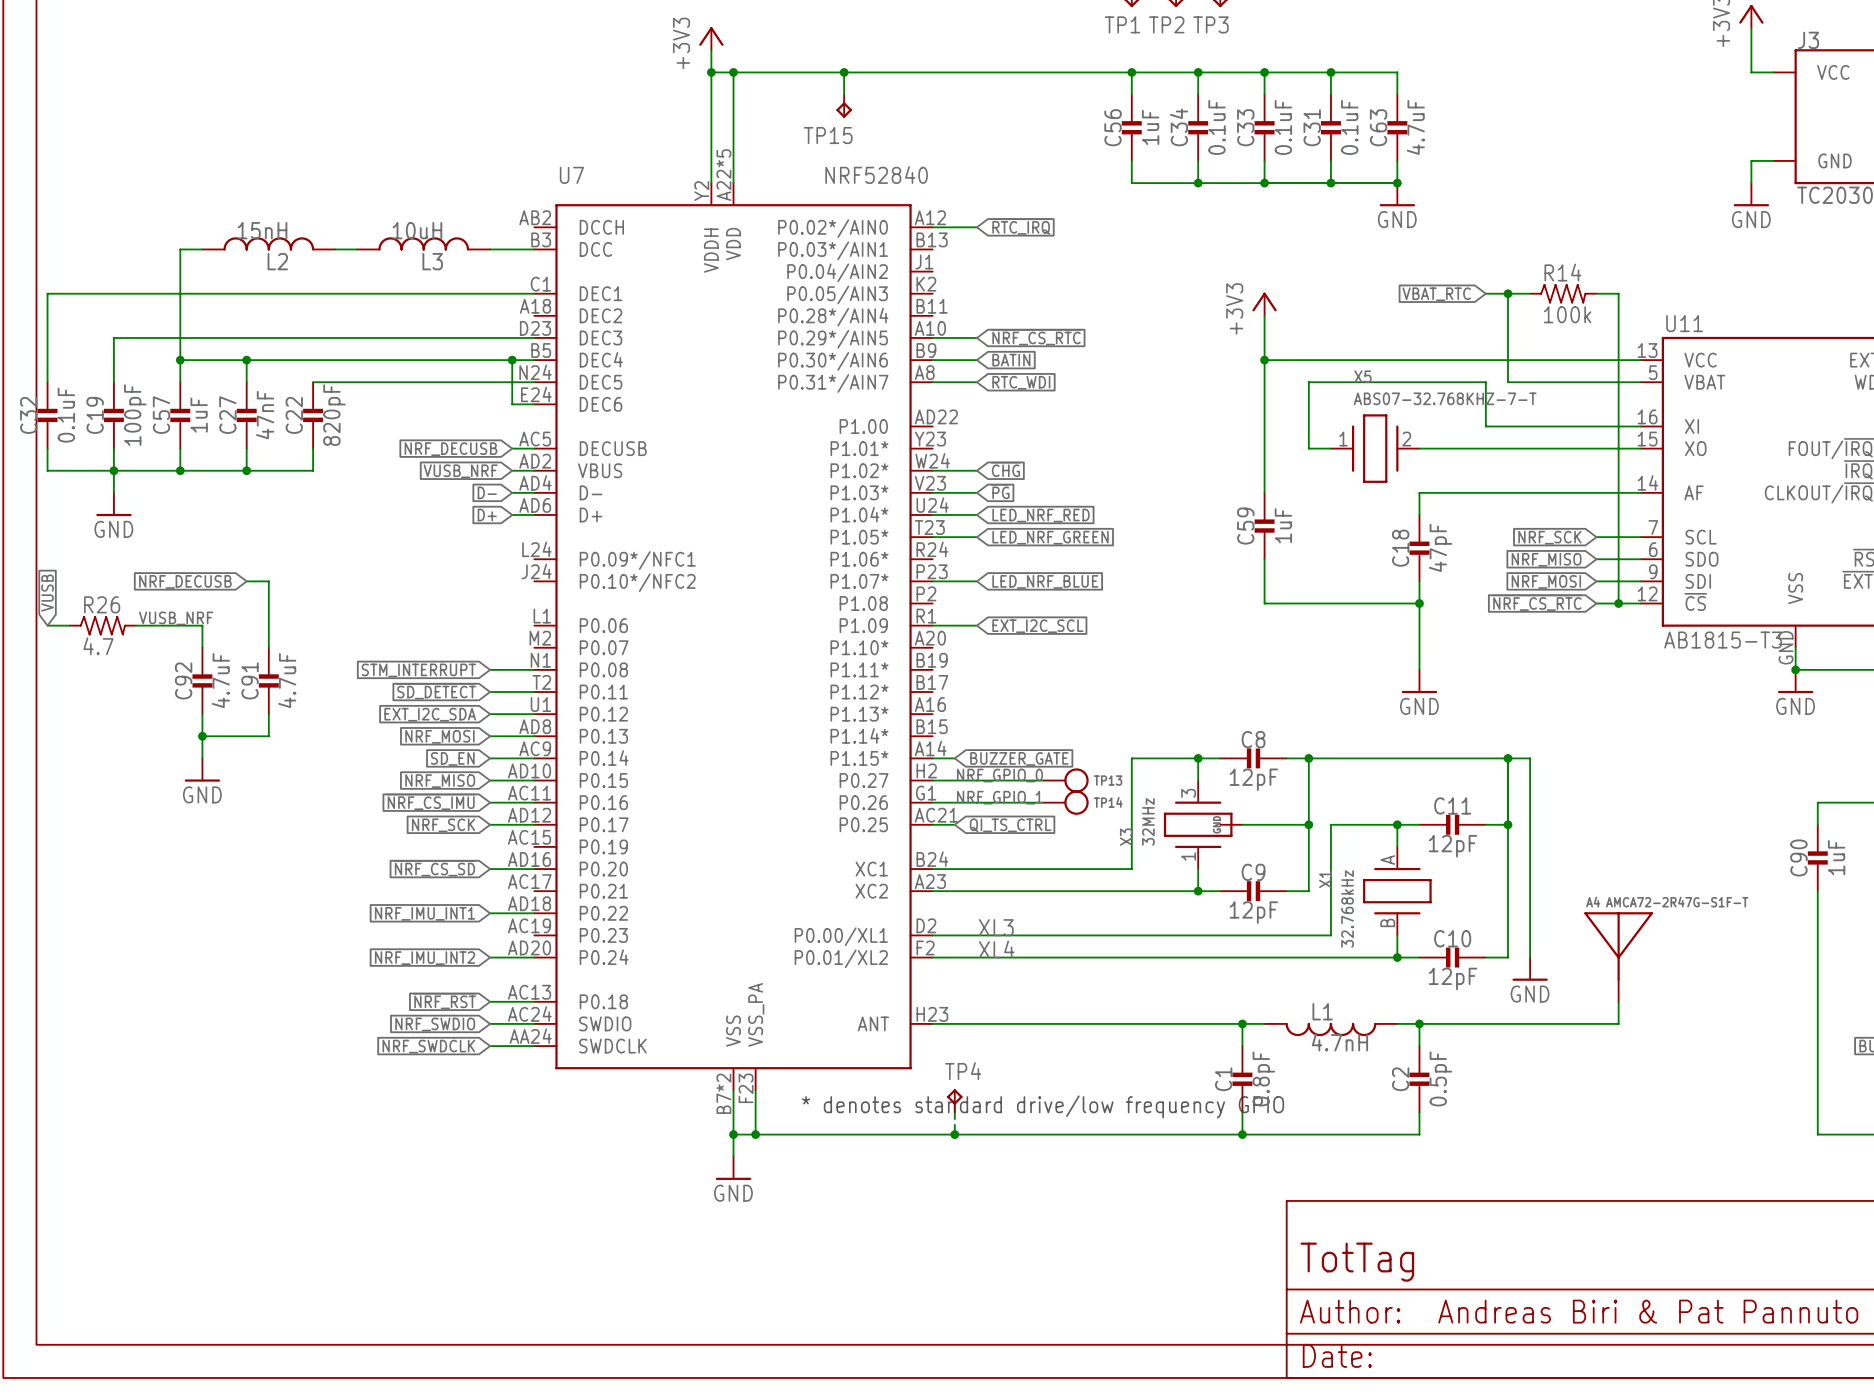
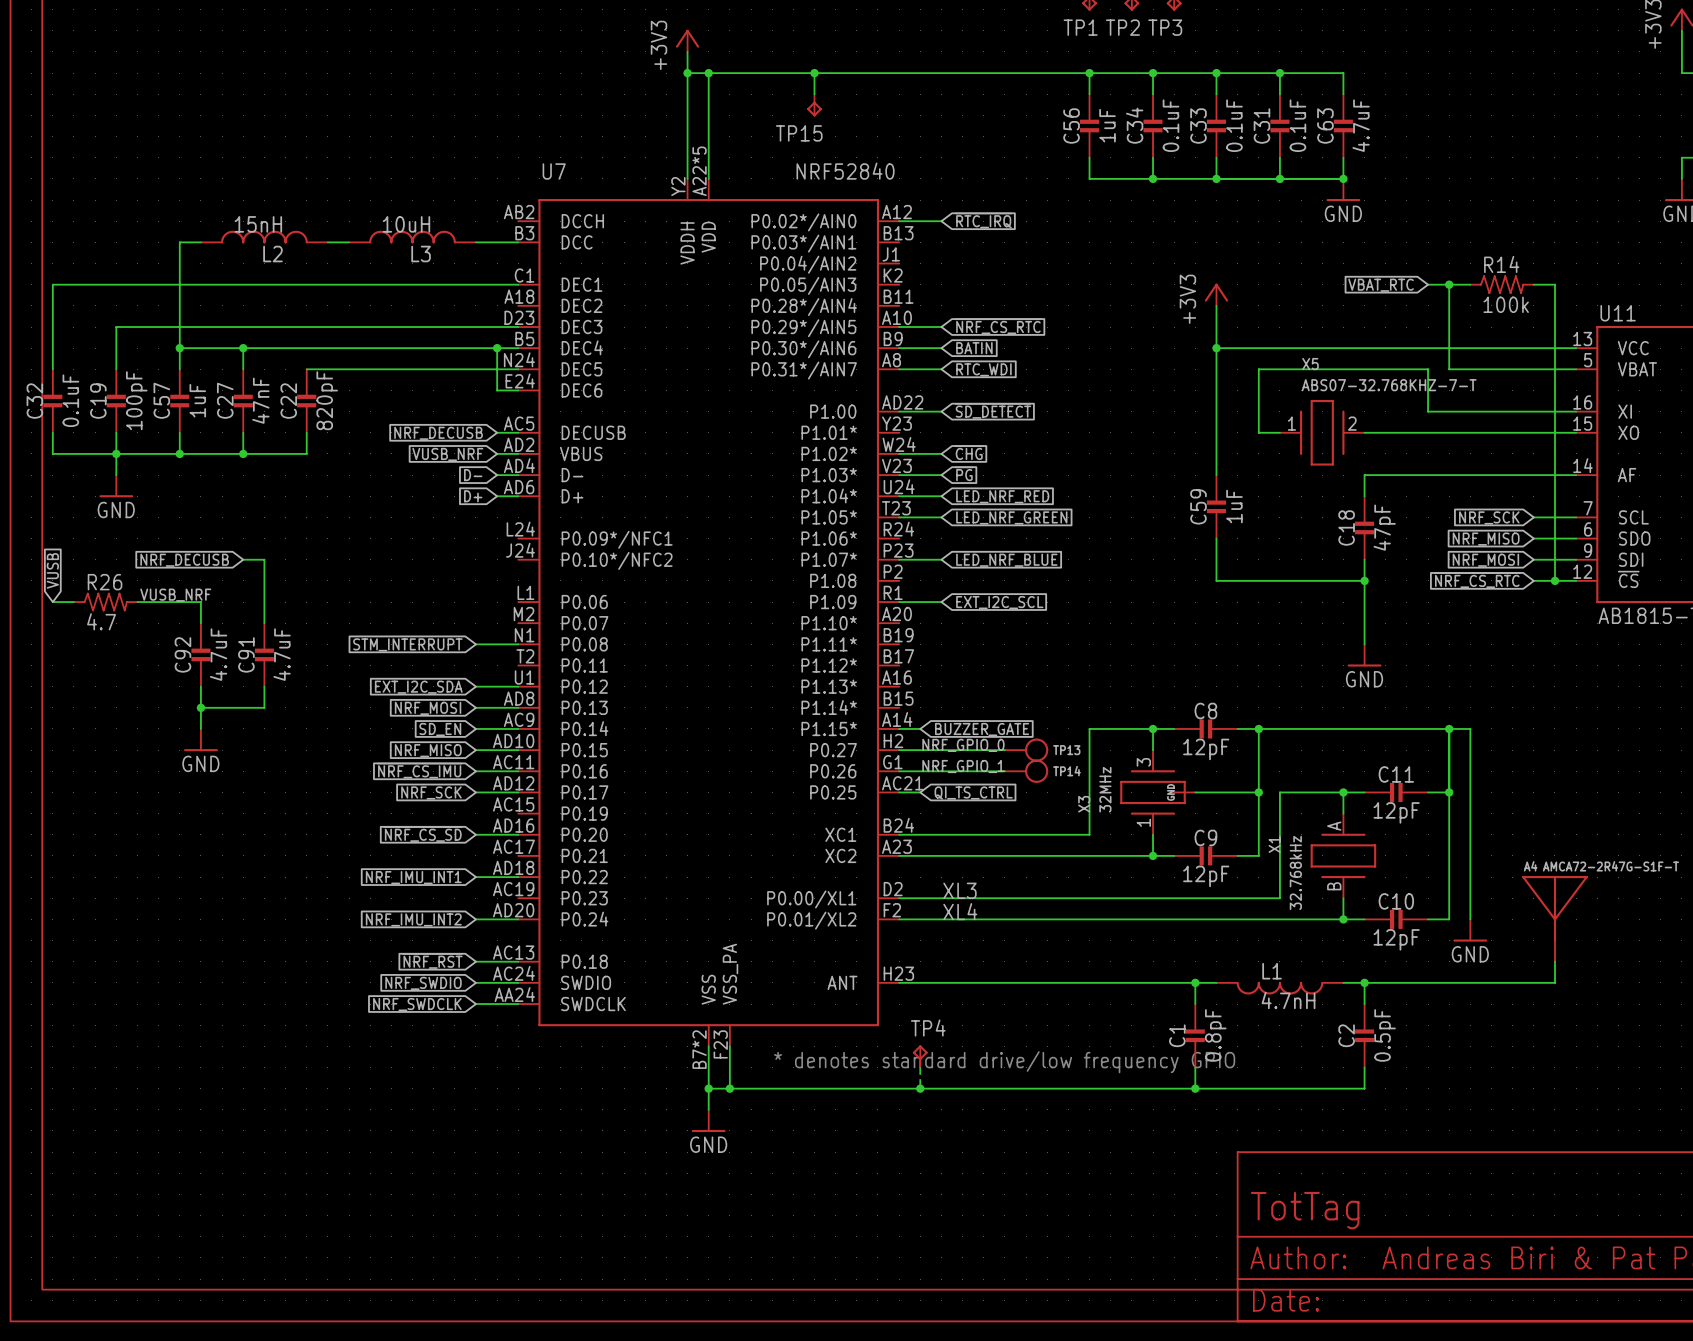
global label: none -> ~{SD_DETECT} (993, 410)
wire: none -> (899, 411) (941, 411)
global label: ~{SD_DETECT} (436, 691) -> none
wire: (490, 692) (534, 692) -> none

